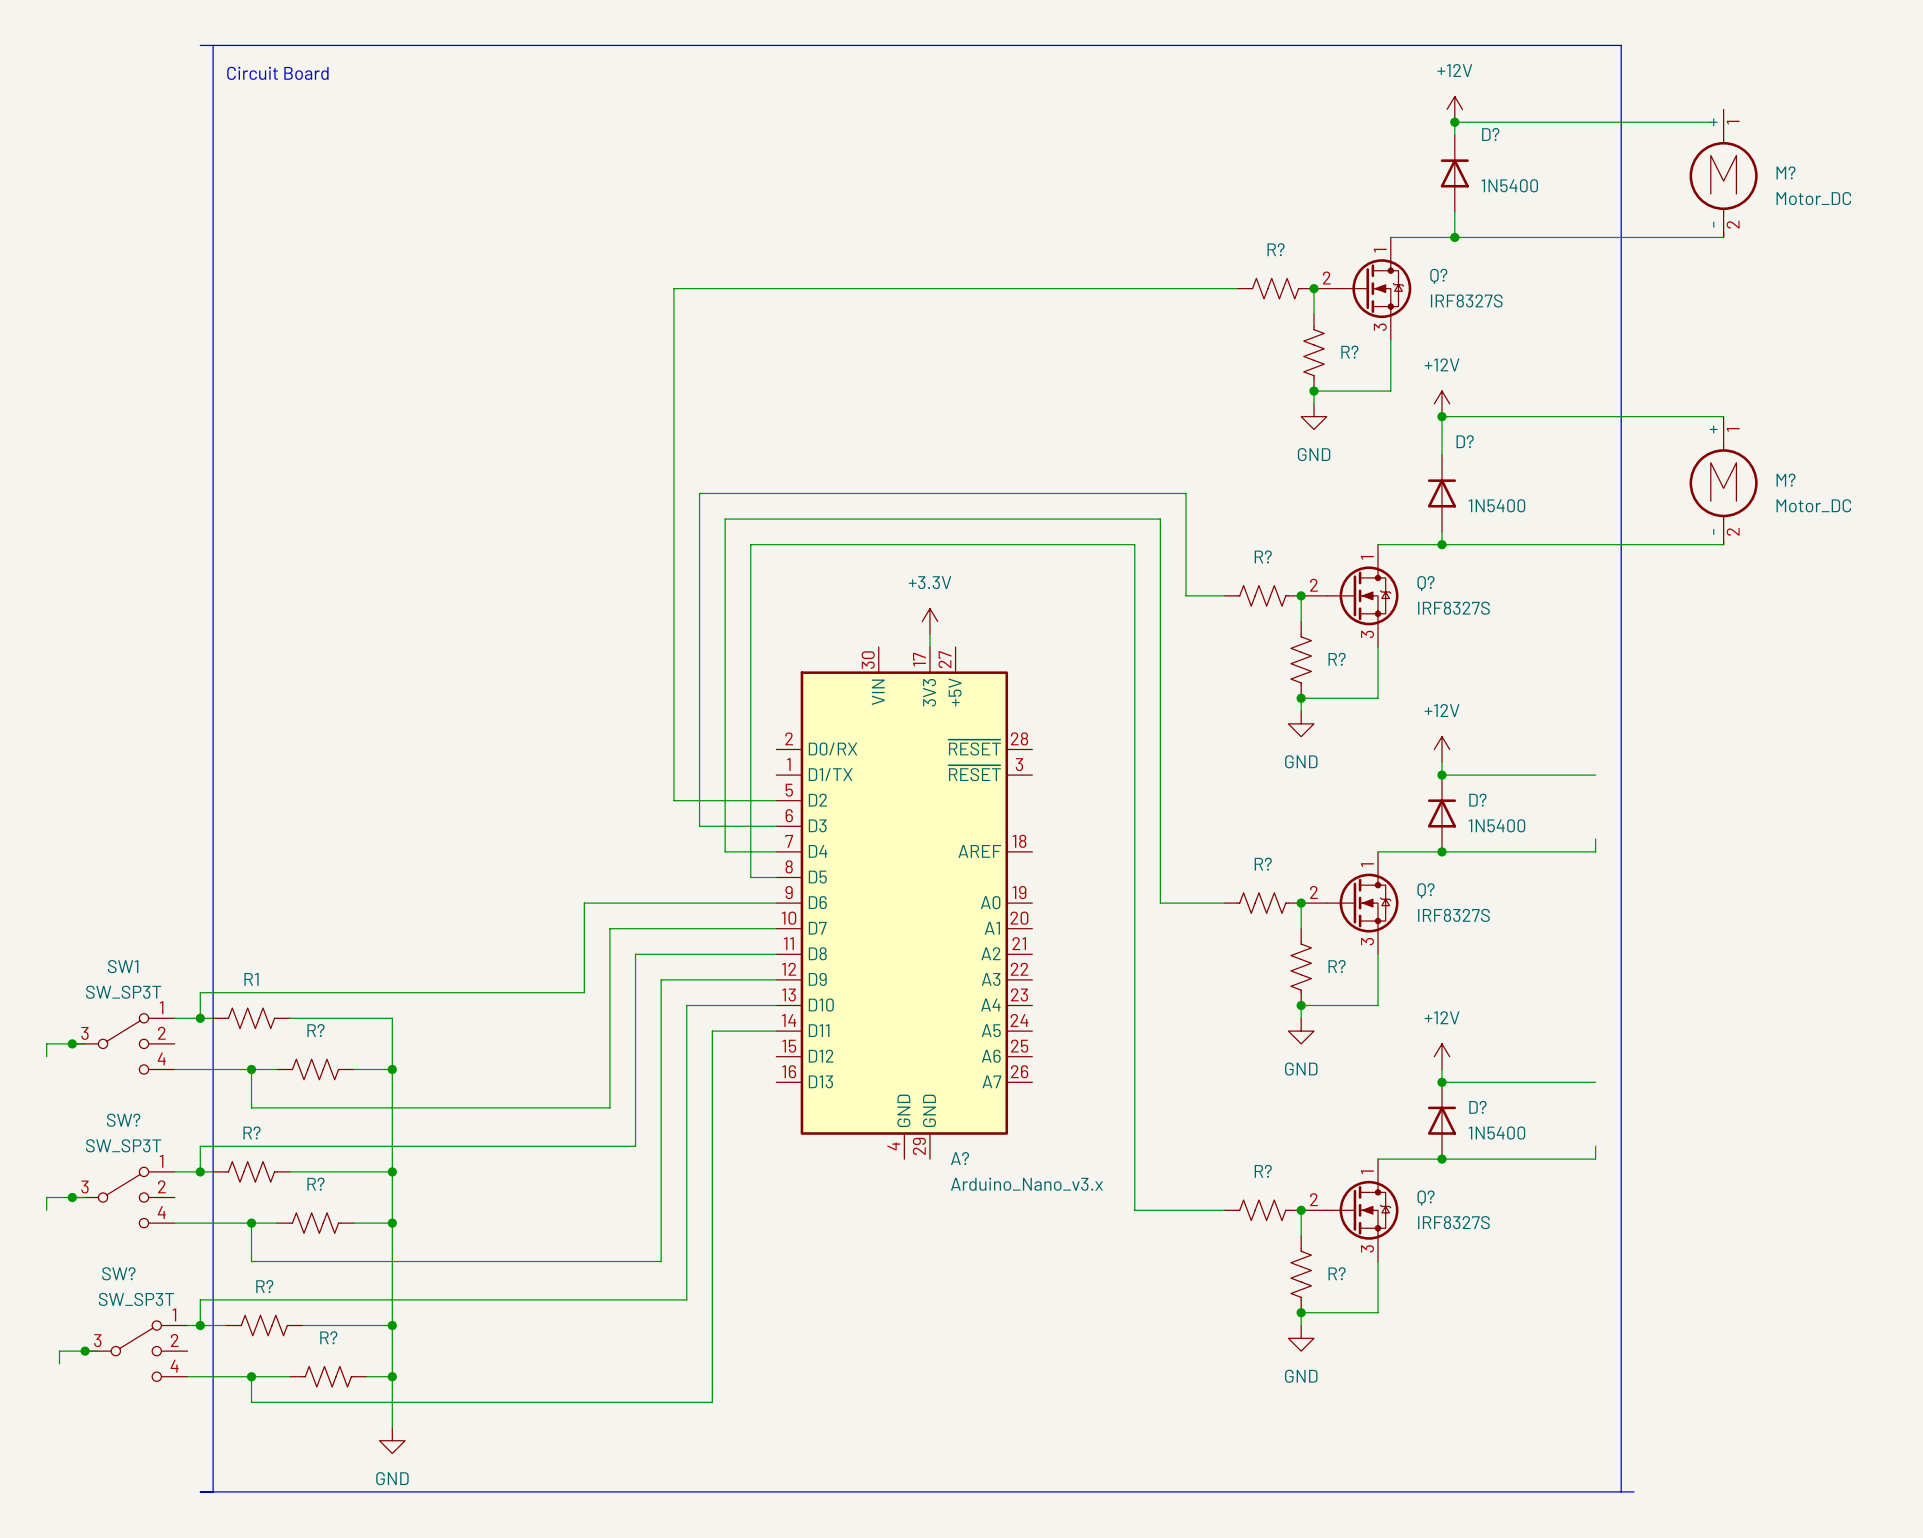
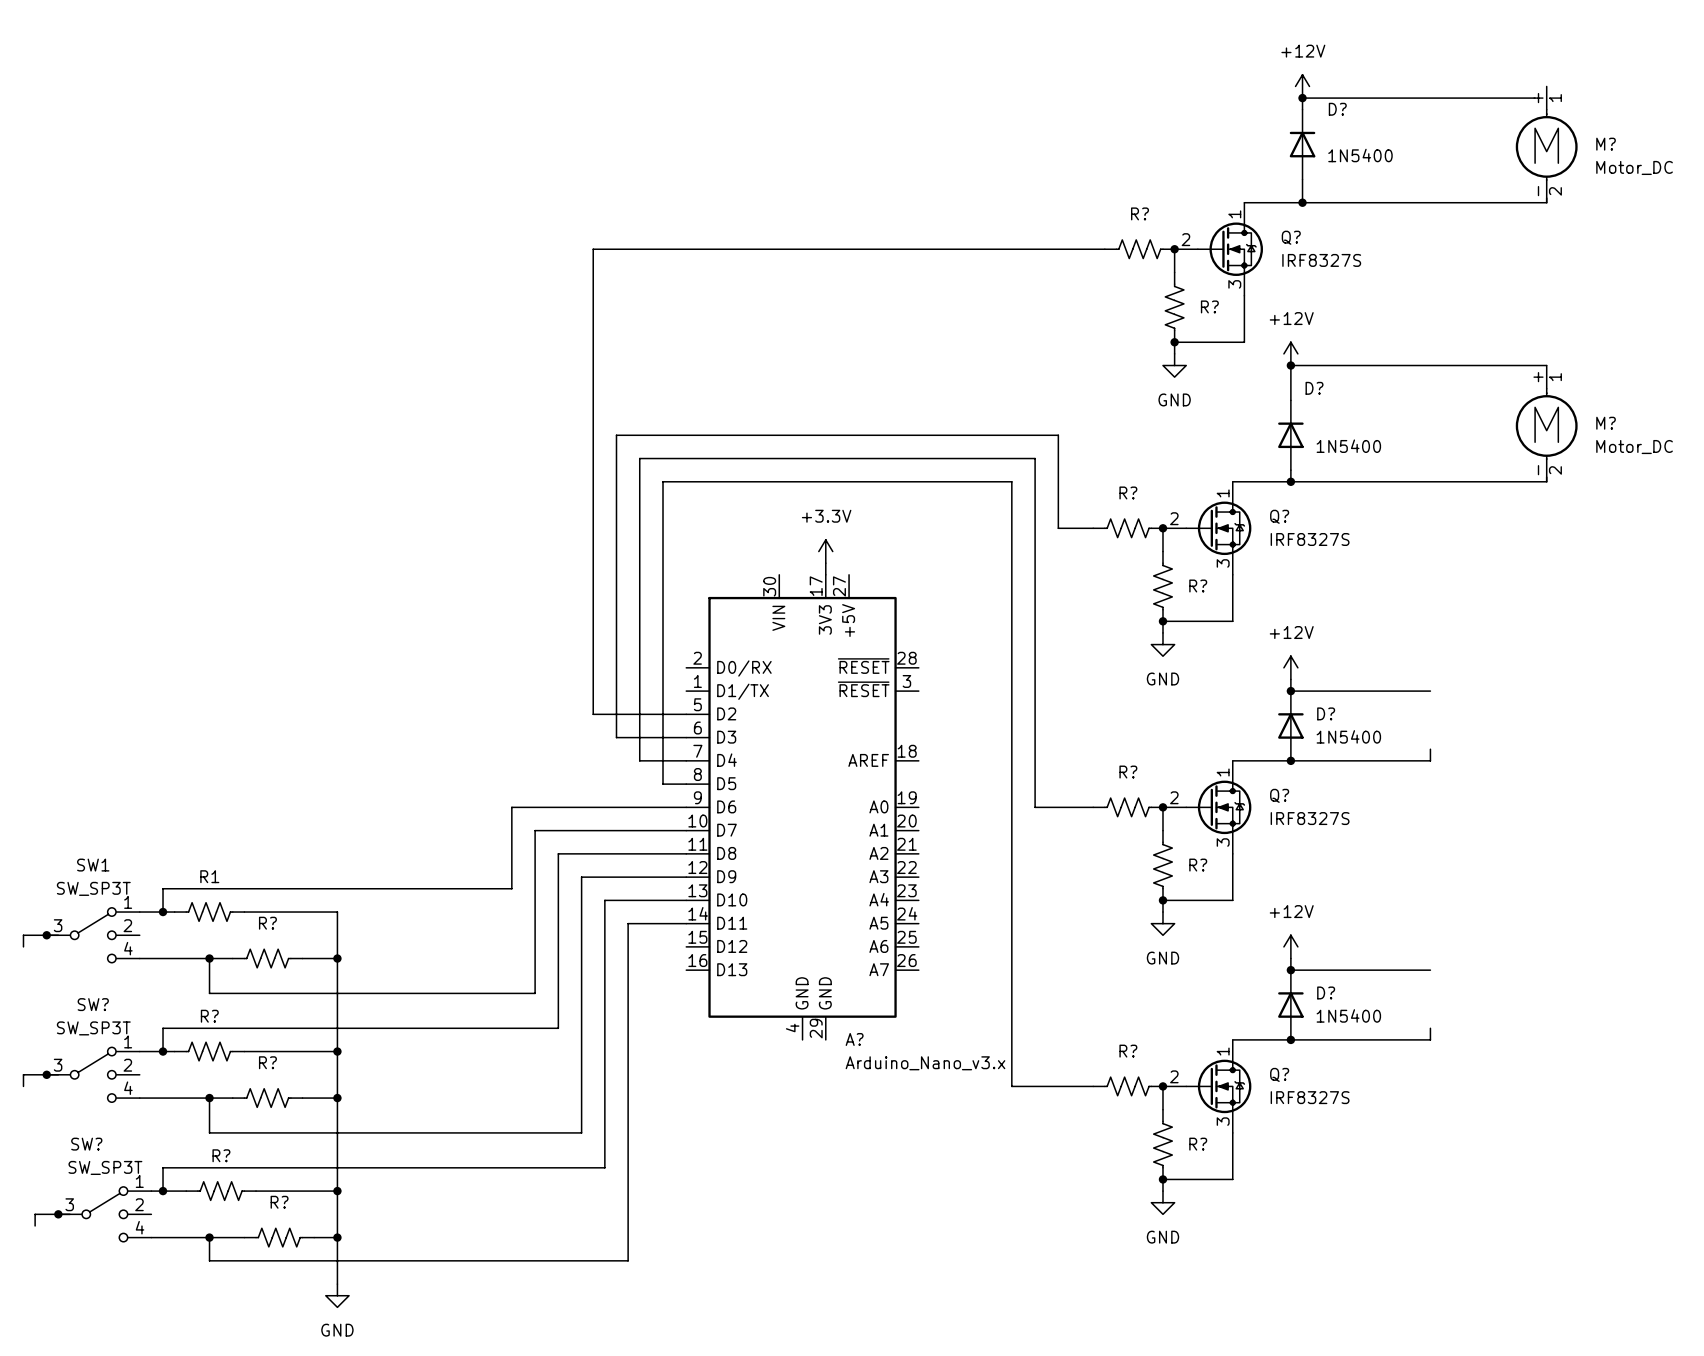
line: (200, 45) (1621, 45) (1621, 1491) -> none
line: (213, 45) (213, 1491) -> none
text: Circuit Board (277, 73) -> none
line: (200, 1491) (1634, 1491) -> none

